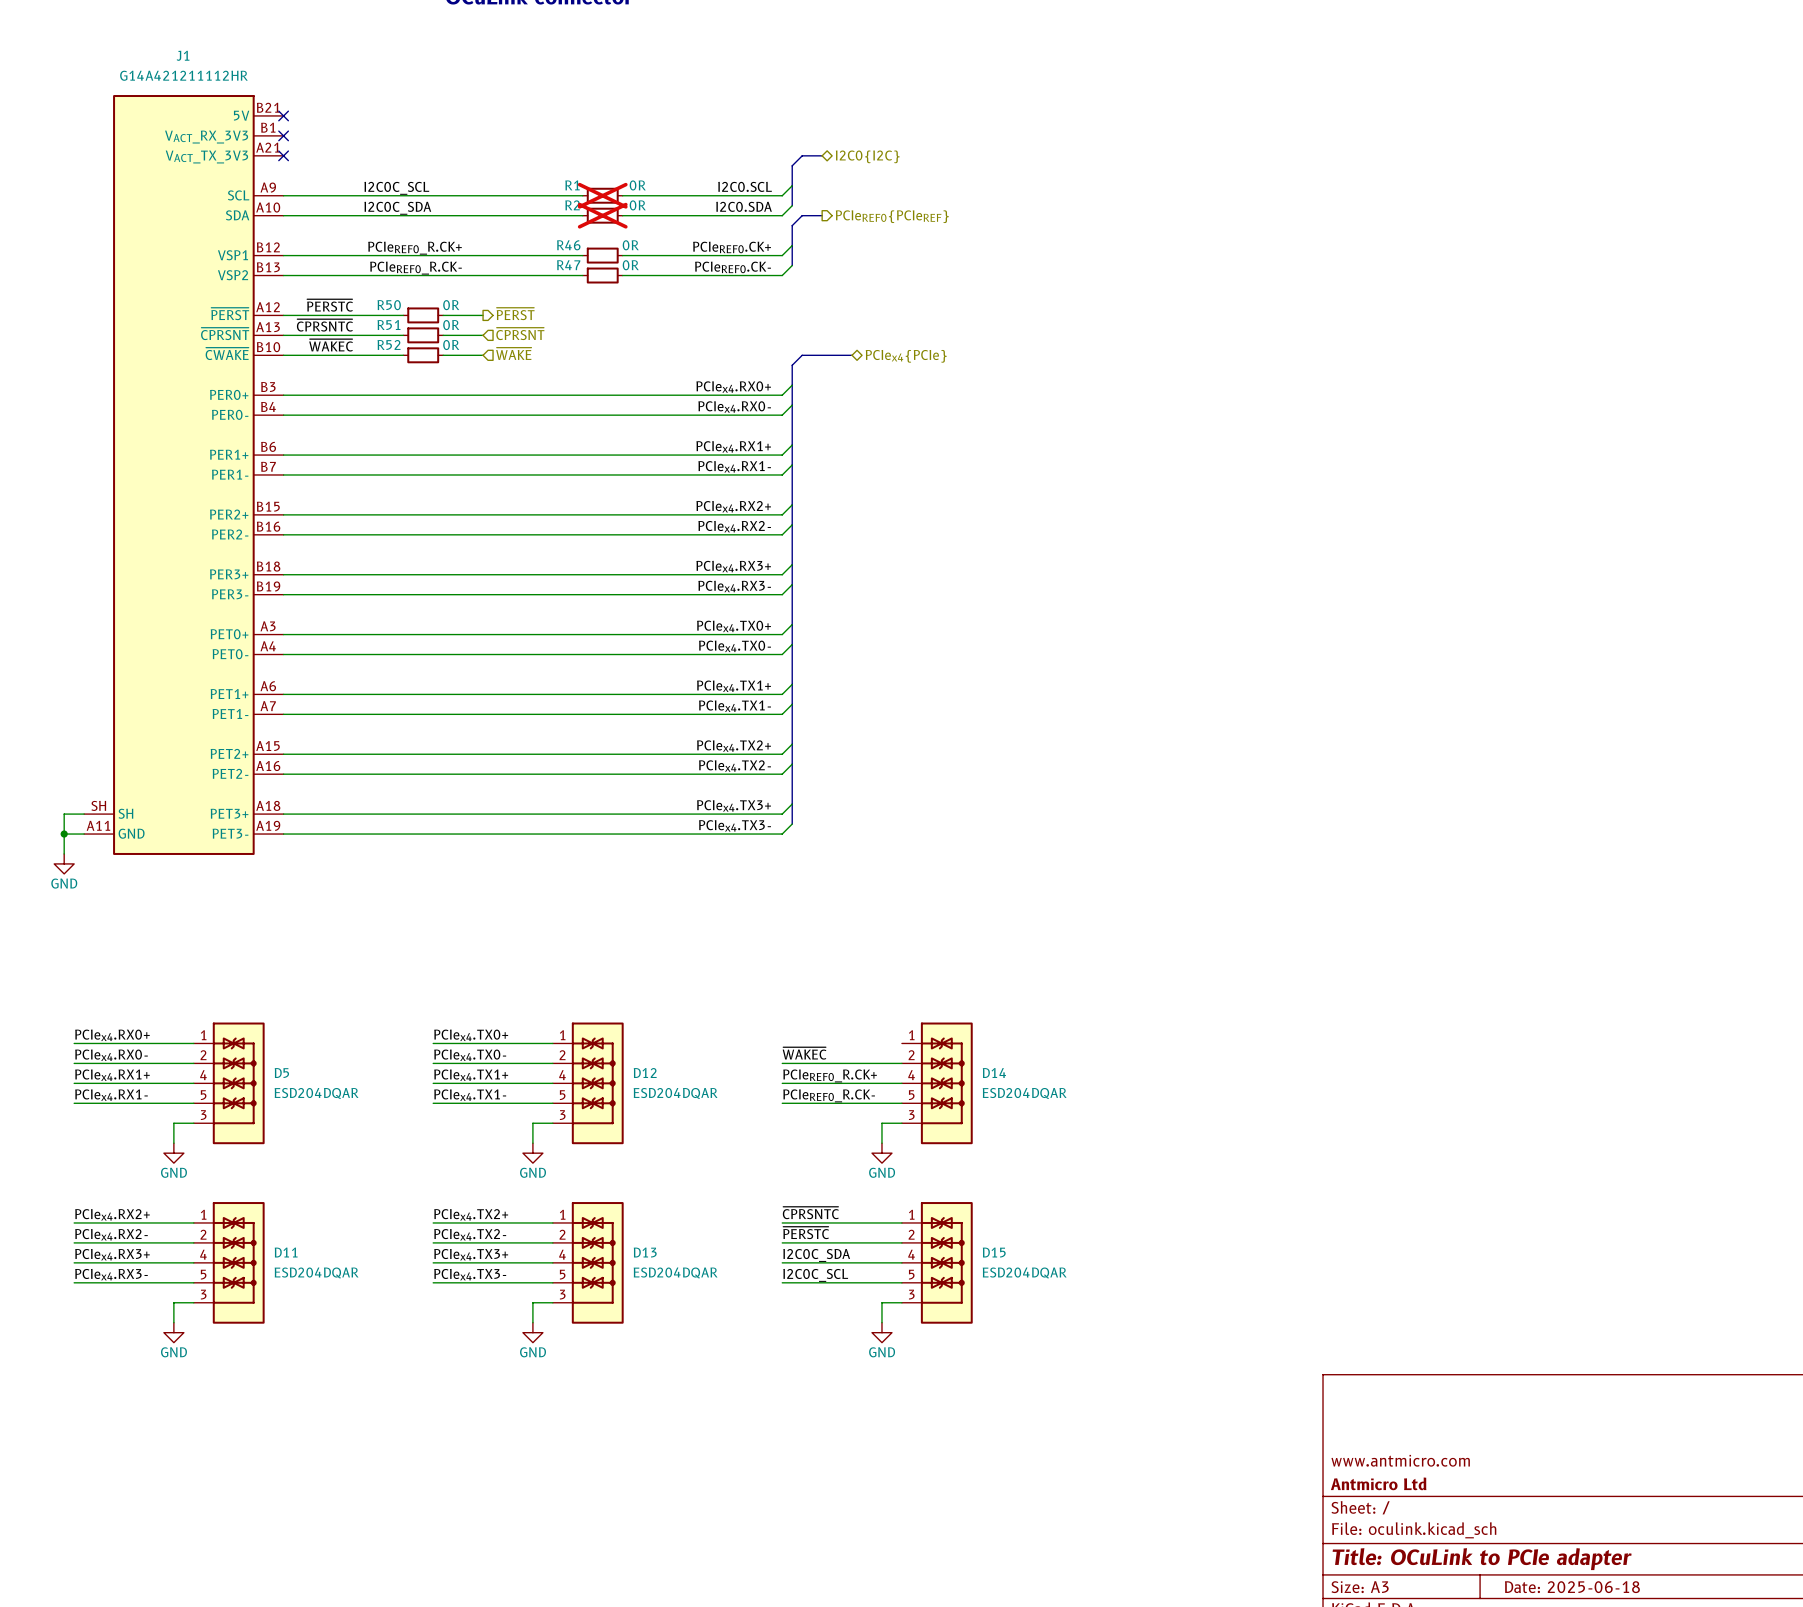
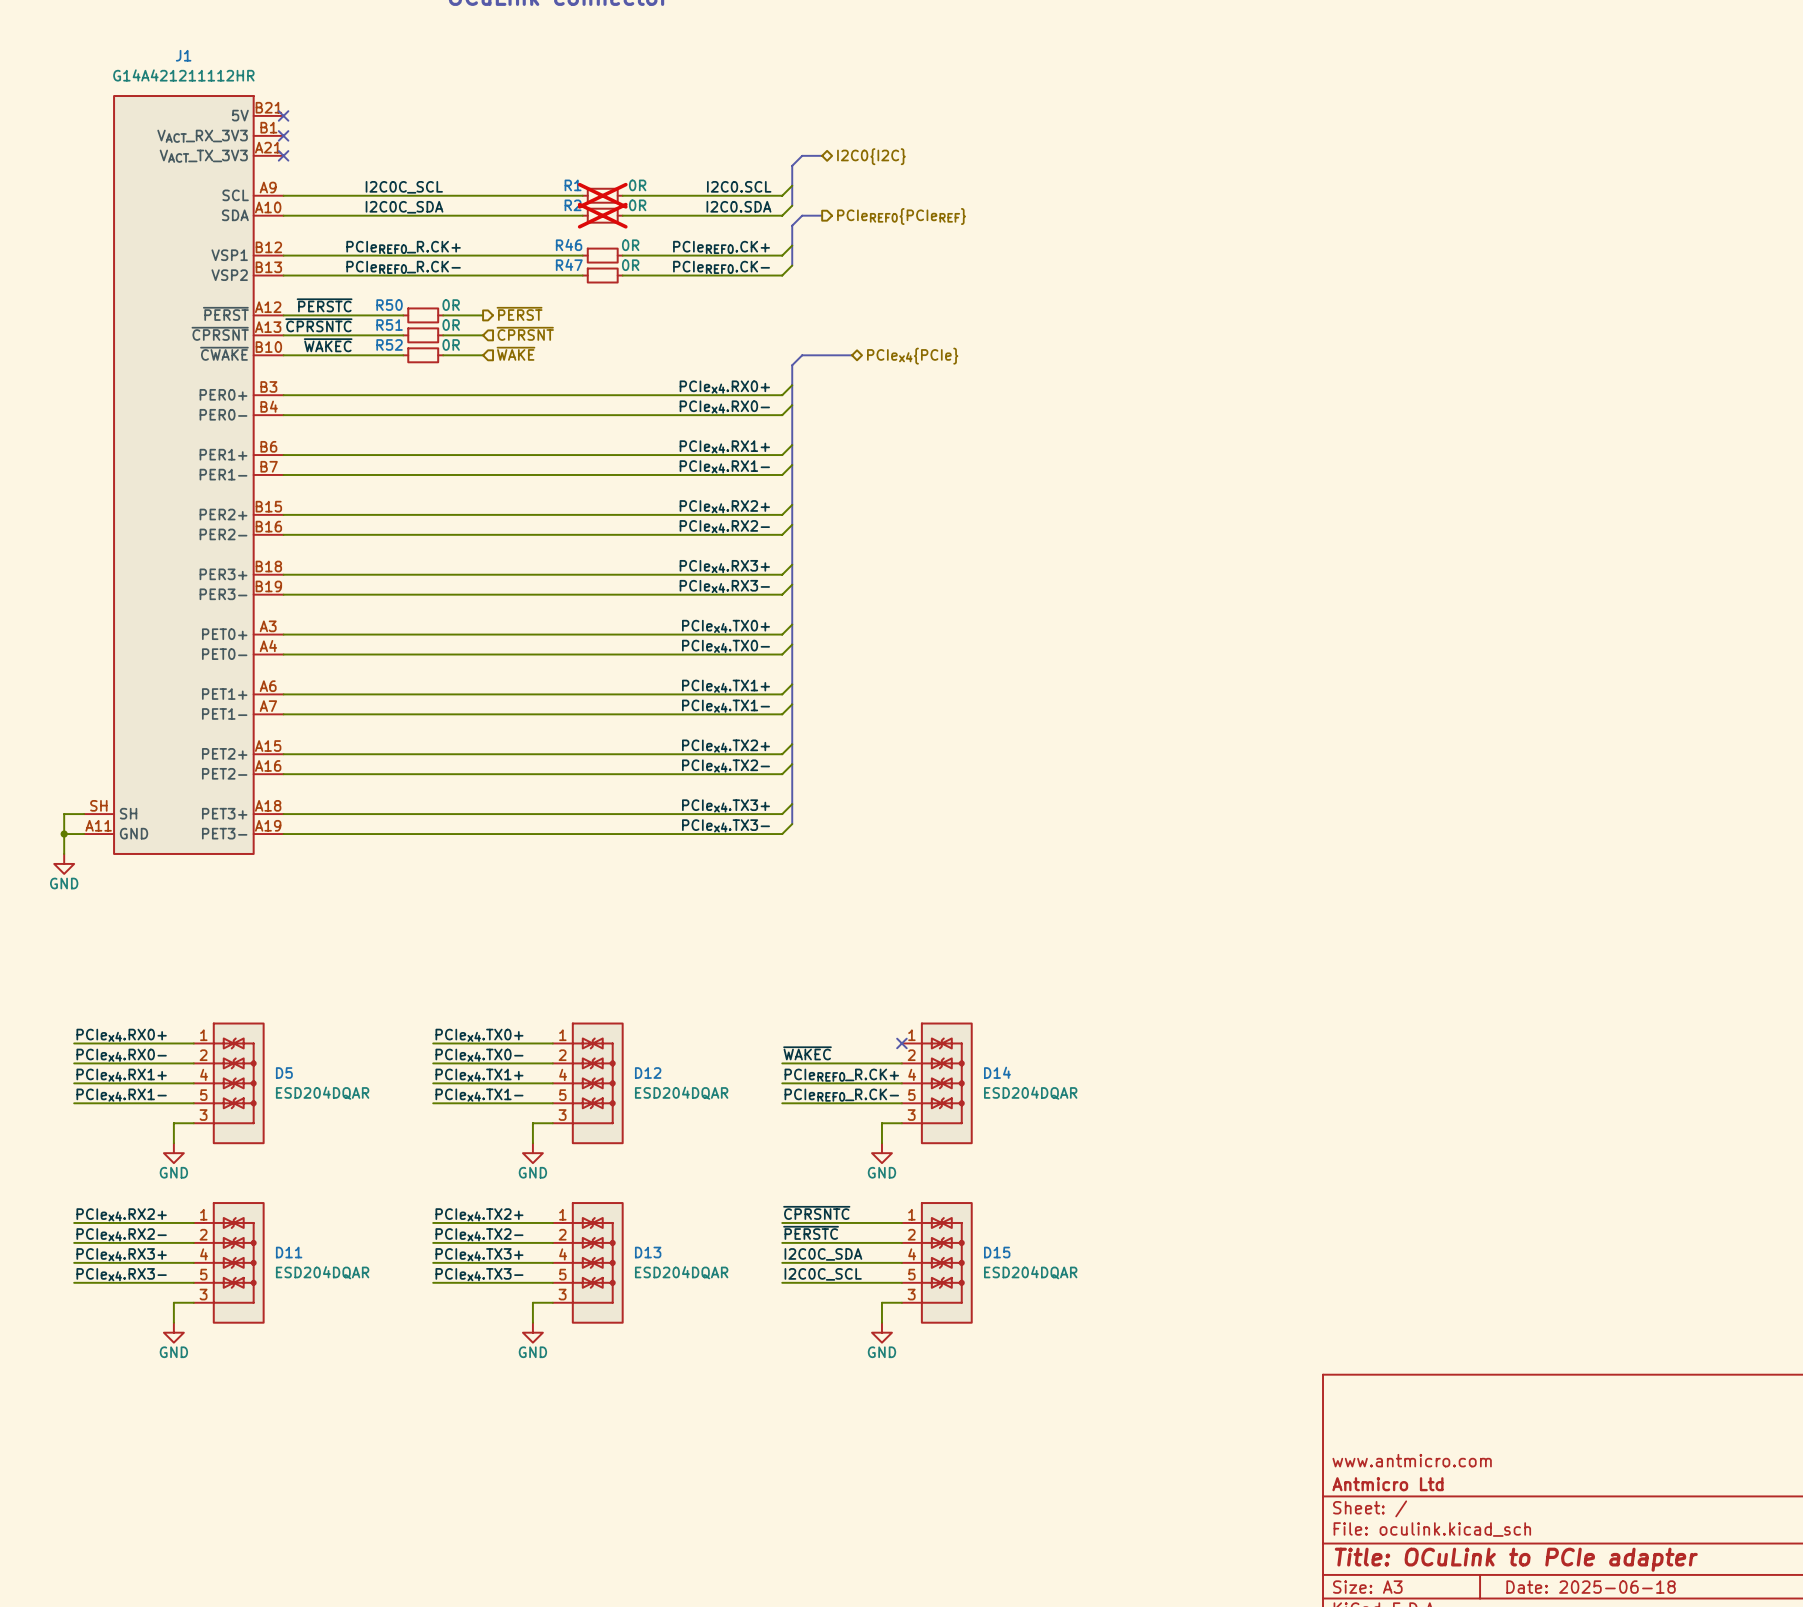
no-connect mark: none -> (901, 1043)

